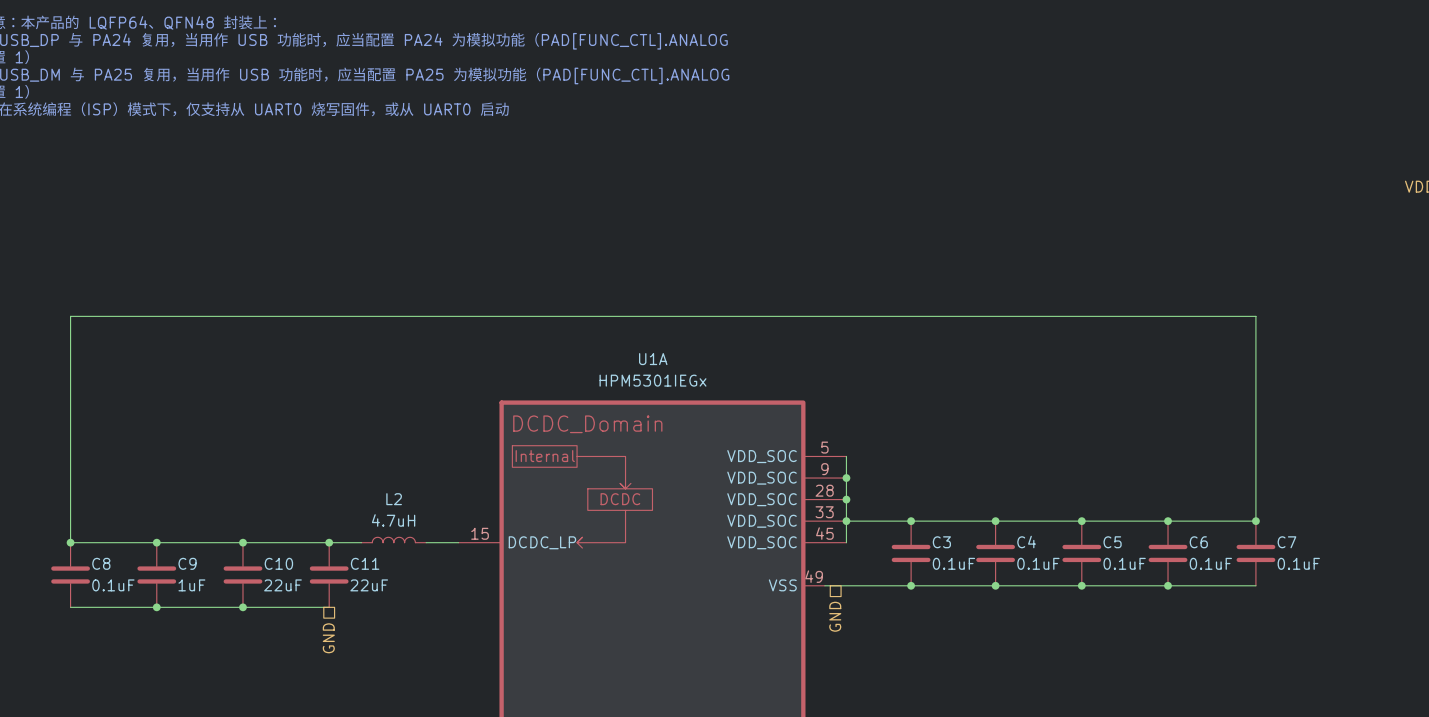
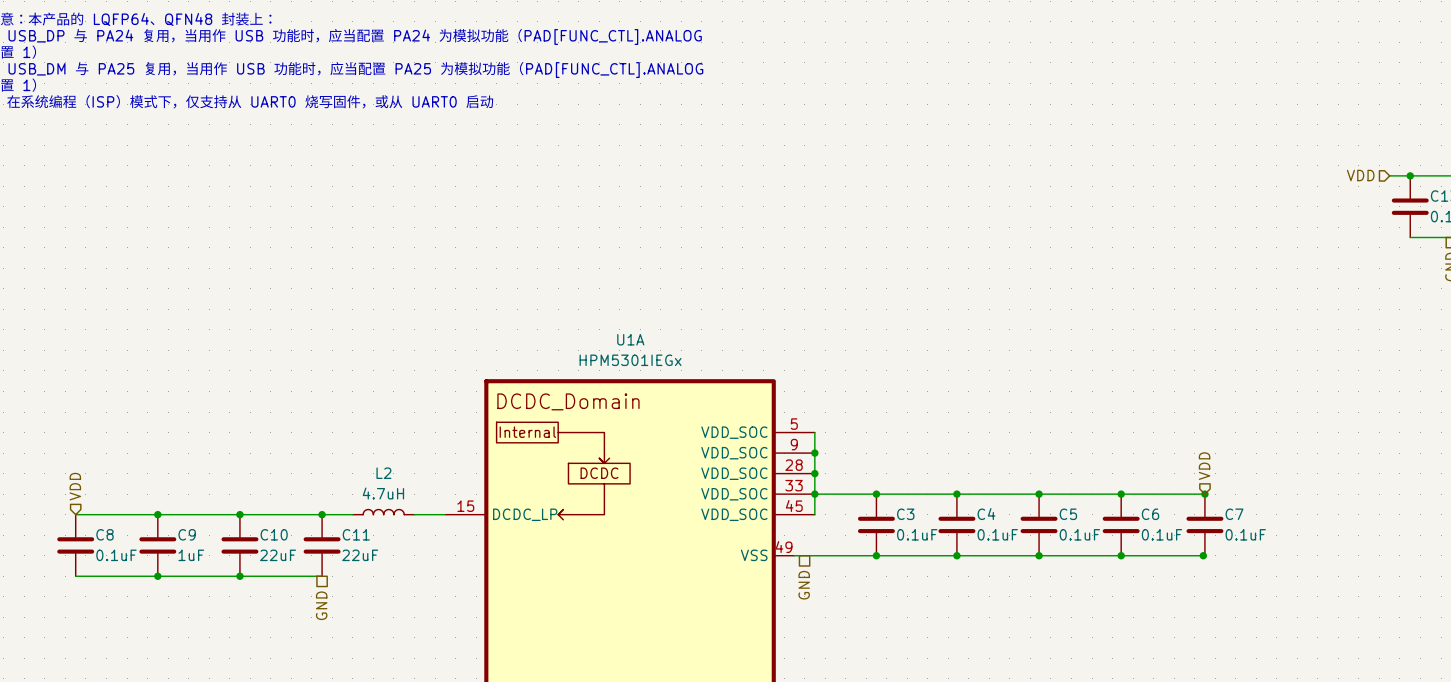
hierarchical label: none -> VDD (1204, 466)
hierarchical label: none -> VDD (75, 486)
wire: (1255, 521) (1255, 316) (70, 316) (70, 542) -> none
junction: (70, 542) -> none
junction: none -> (1203, 555)

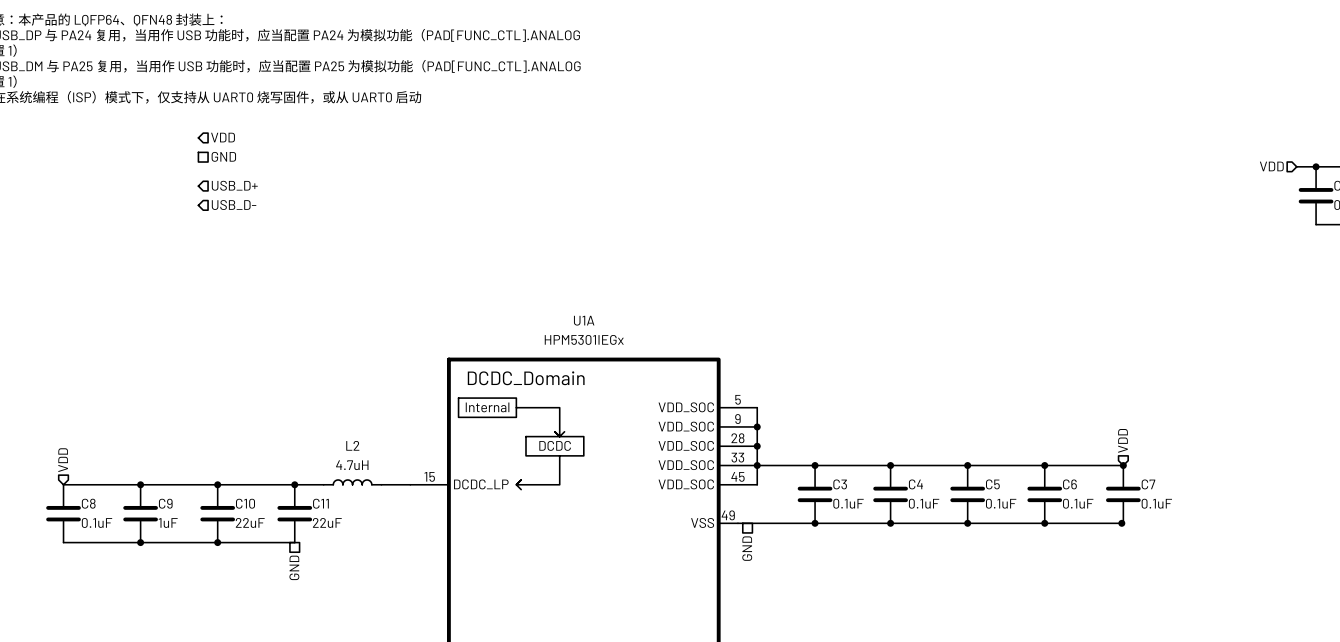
hierarchical label: none -> VDD (223, 137)
hierarchical label: none -> GND (223, 156)
hierarchical label: none -> USB_D+ (234, 185)
hierarchical label: none -> USB_D- (234, 205)

